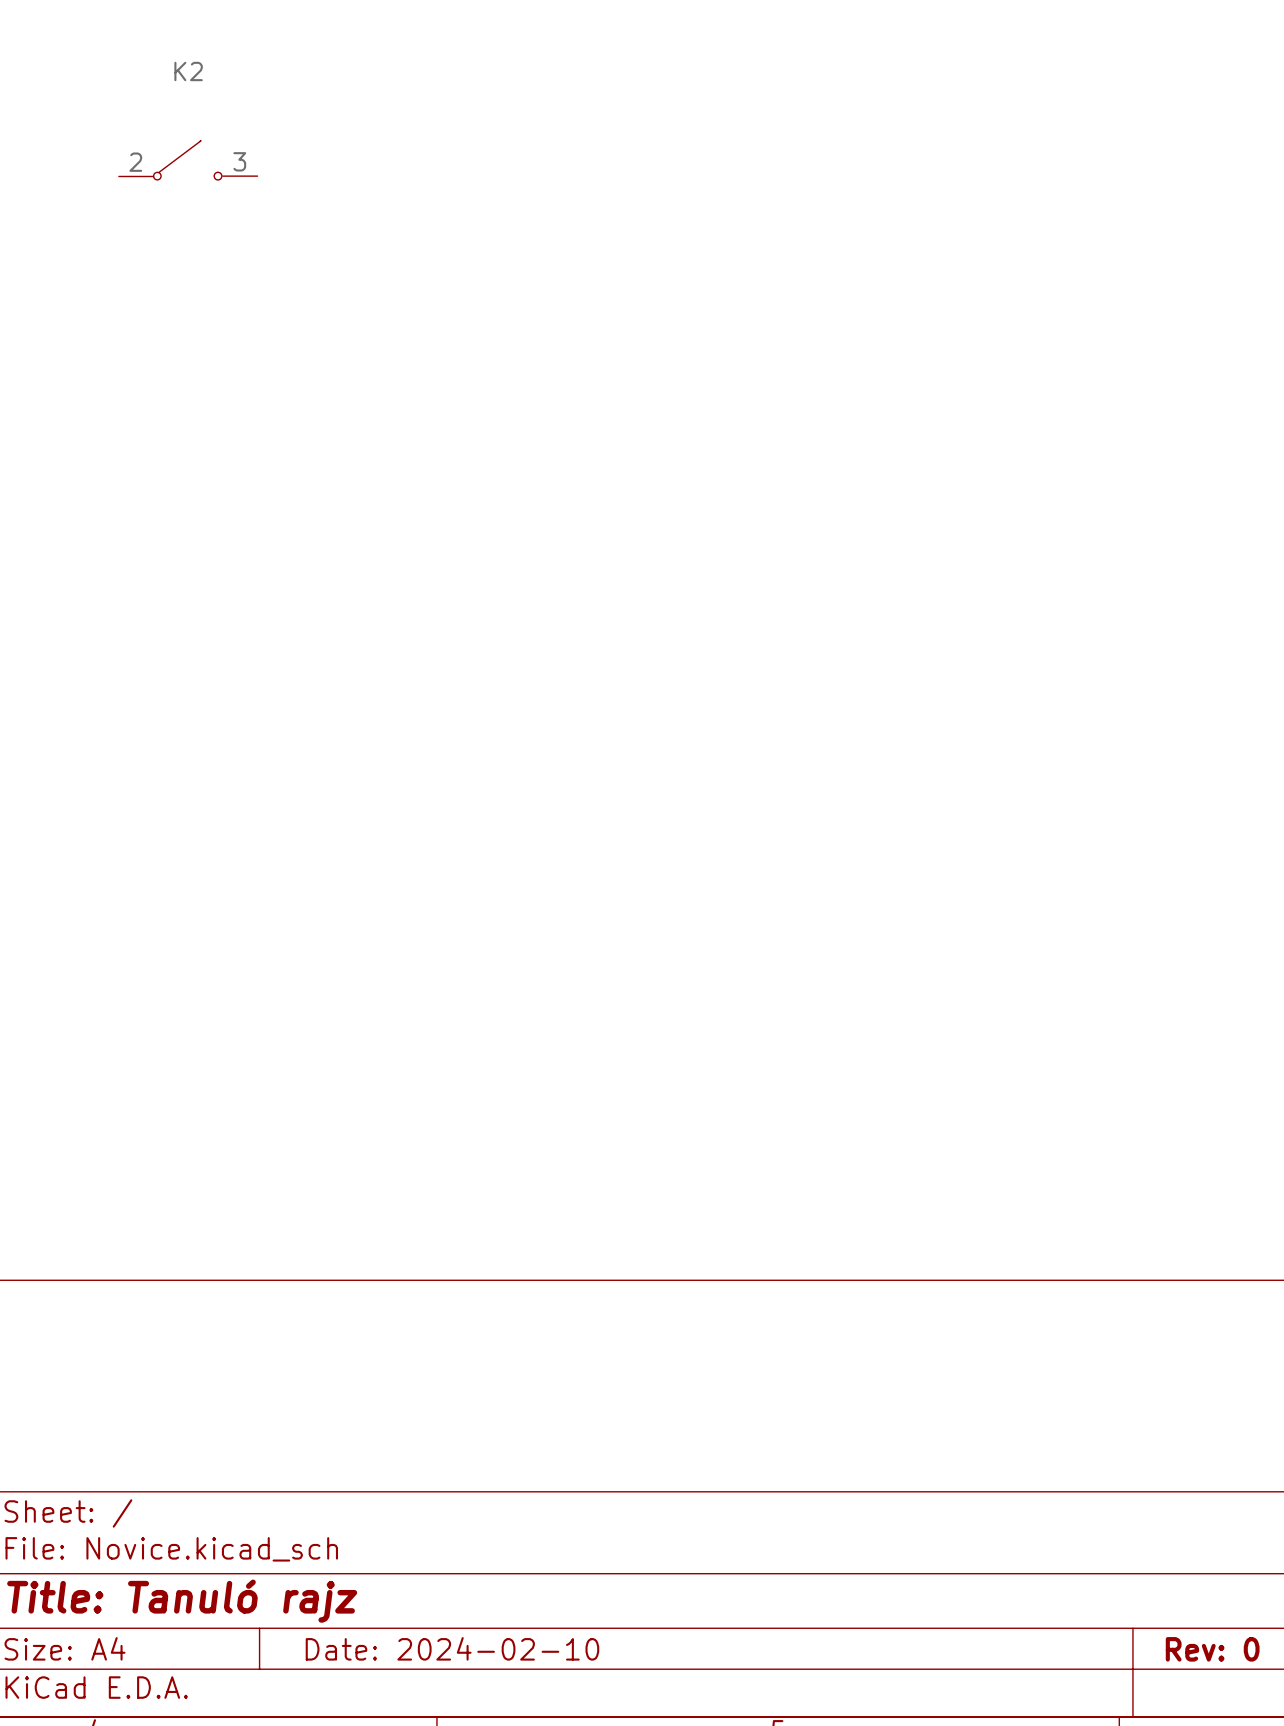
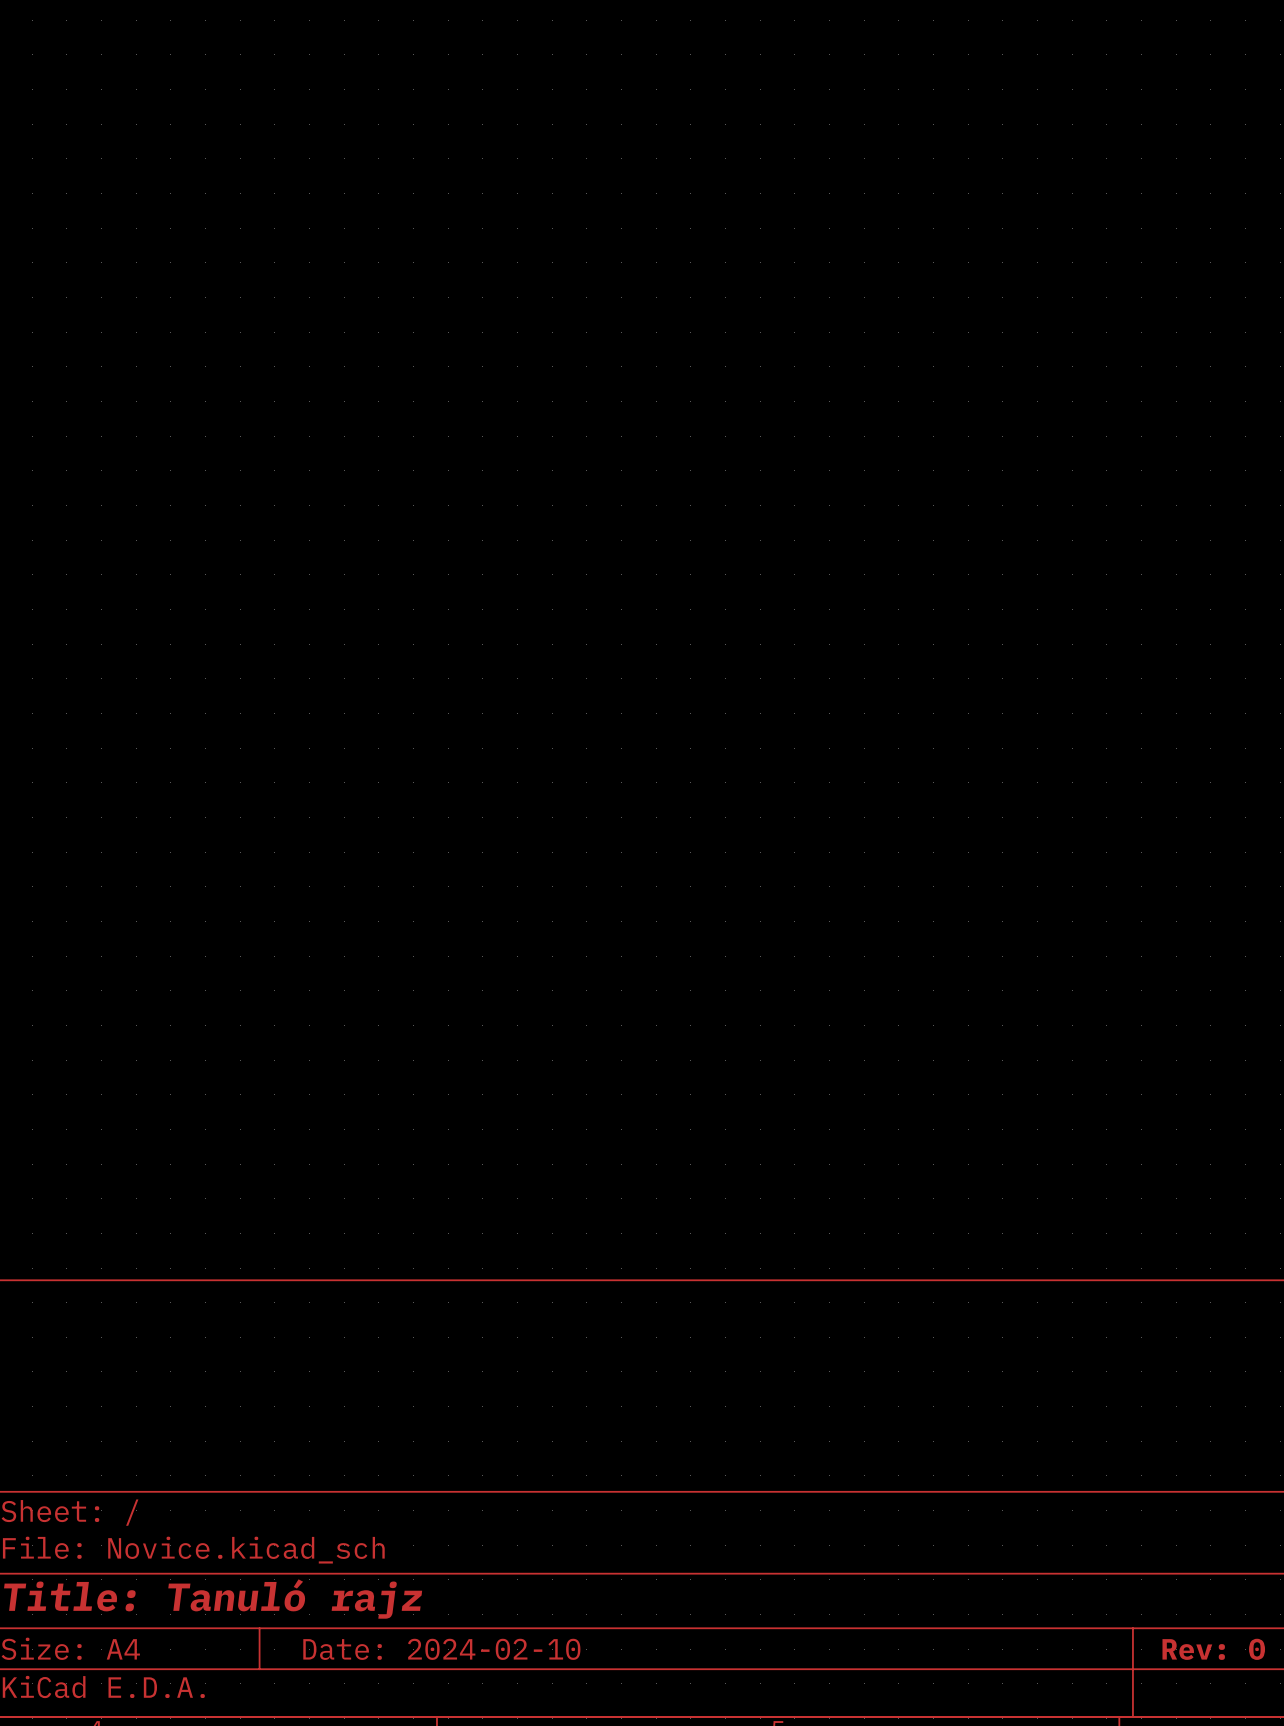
K2: (188, 160) -> none

